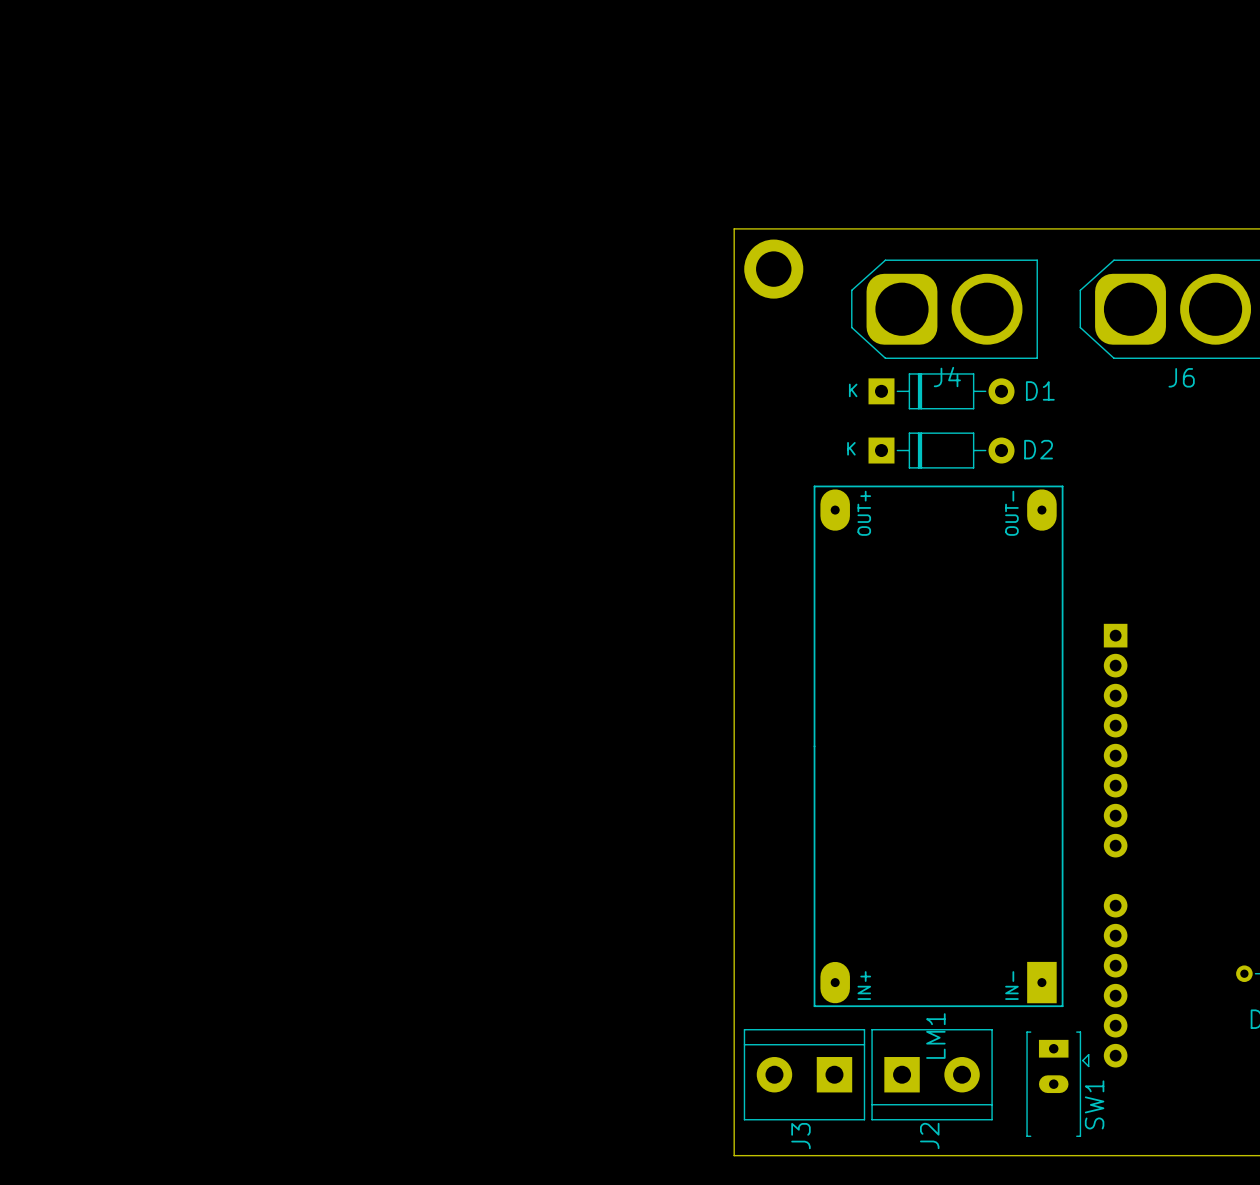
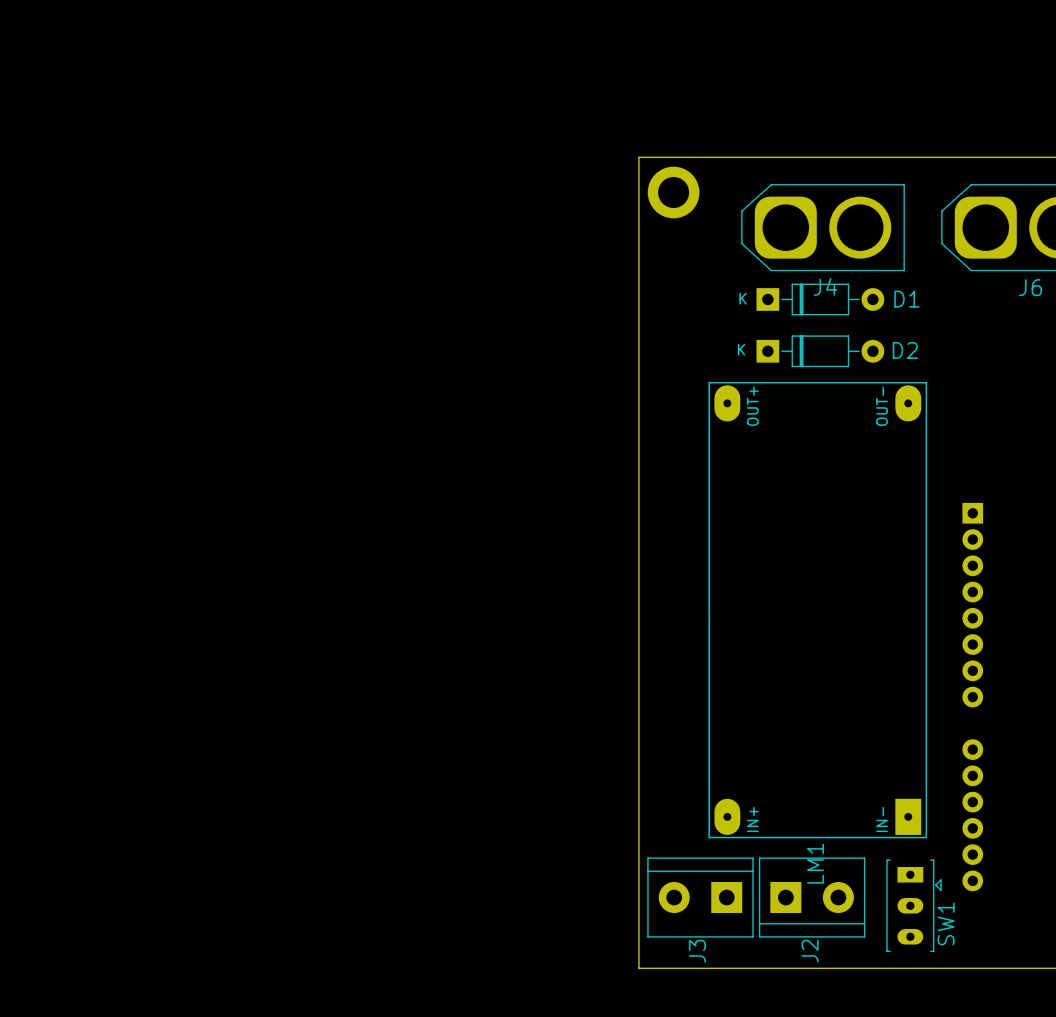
SW1 footprint: [1026, 1031, 1090, 1137] -> [886, 859, 942, 952]

